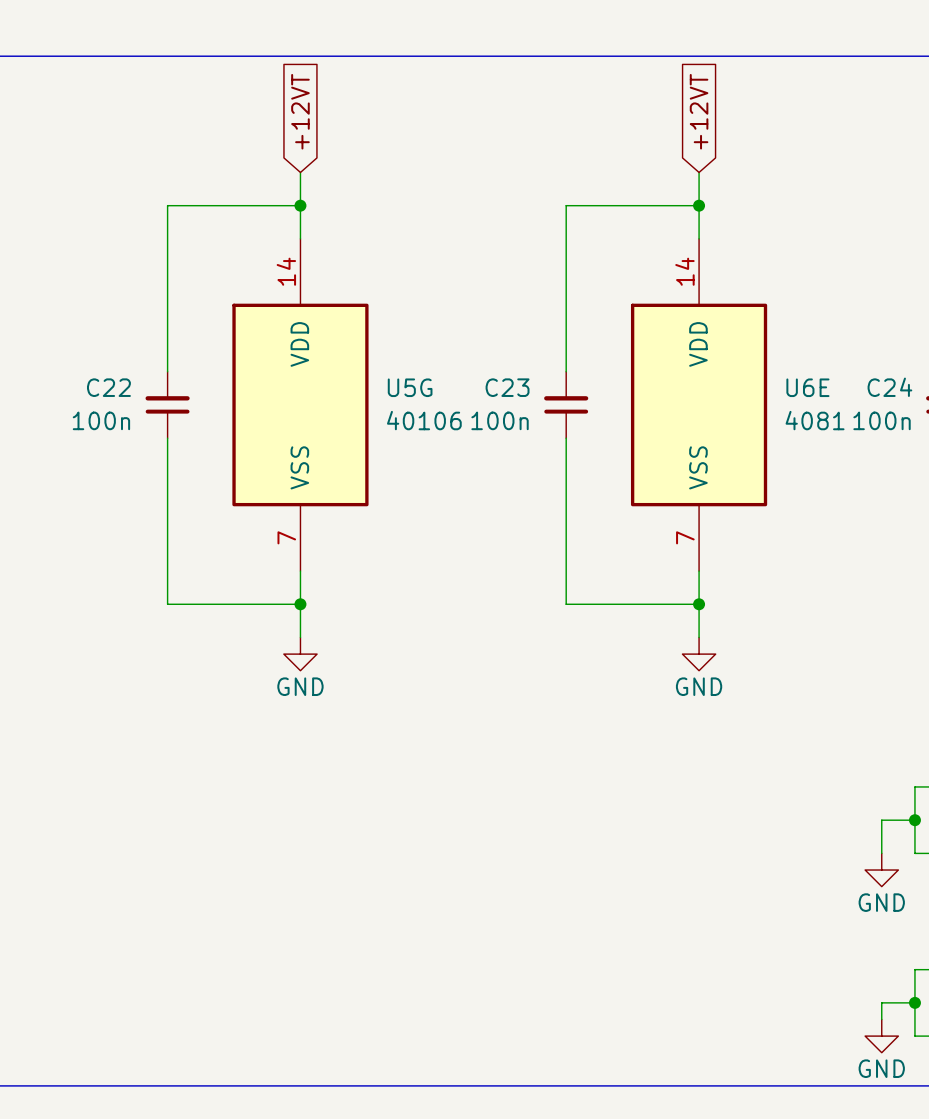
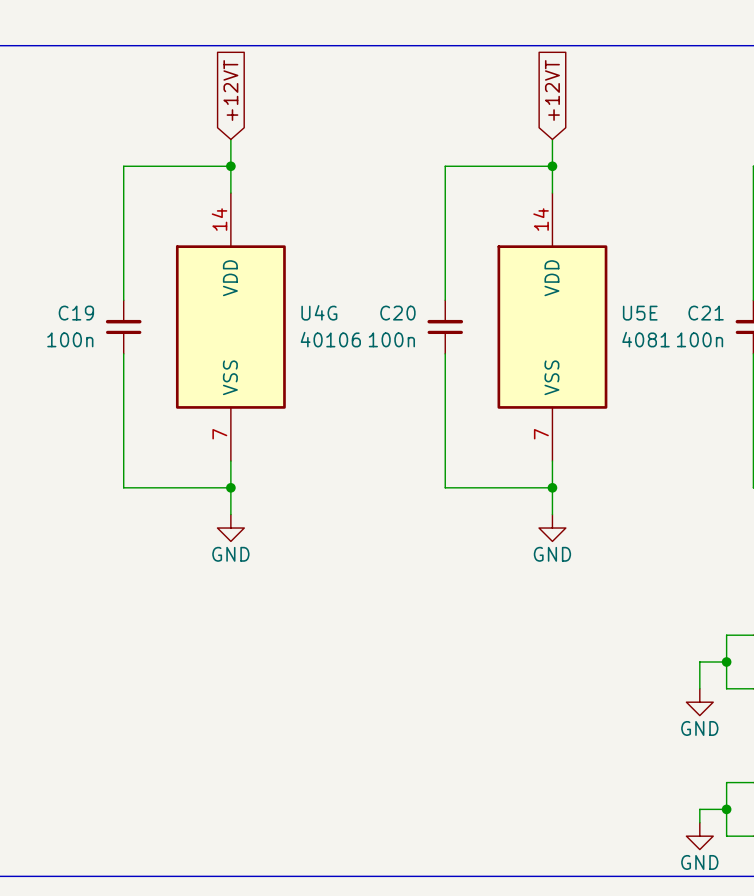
C22 name: C22 (108, 387) -> C19 (76, 313)
U5G name: U5G (410, 387) -> U4G (319, 312)
C23 name: C23 (507, 387) -> C20 (397, 313)
U6E name: U6E (807, 387) -> U5E (640, 313)
C24 name: C24 (889, 387) -> C21 (706, 313)

